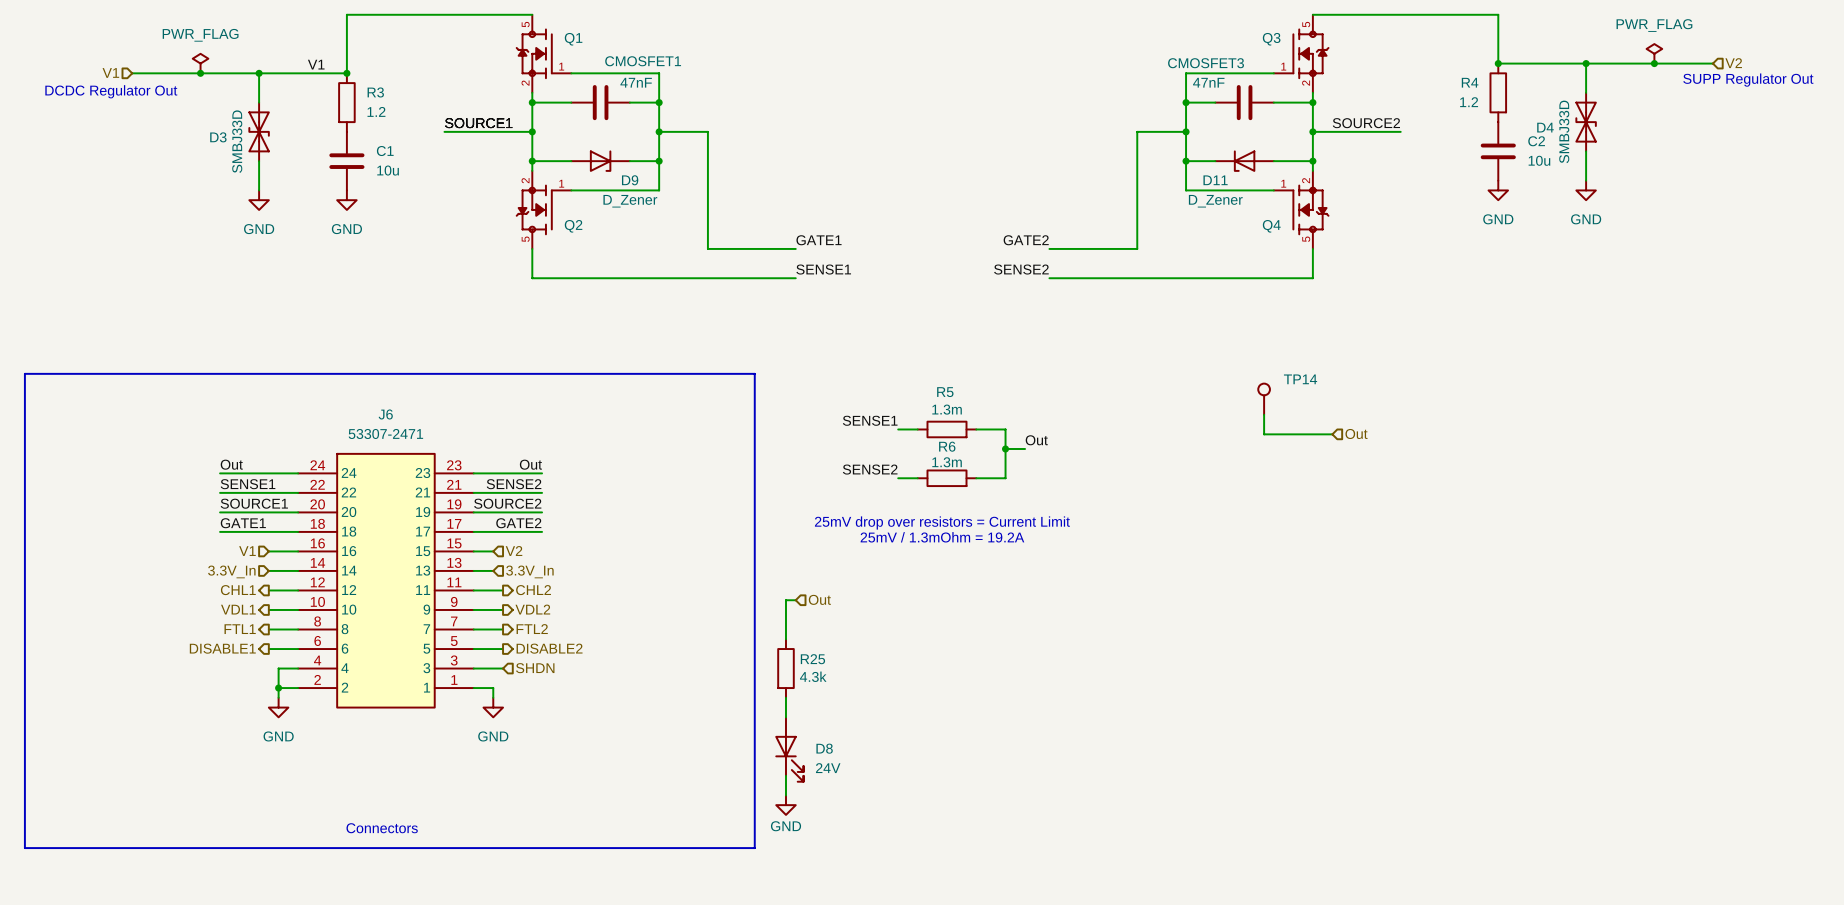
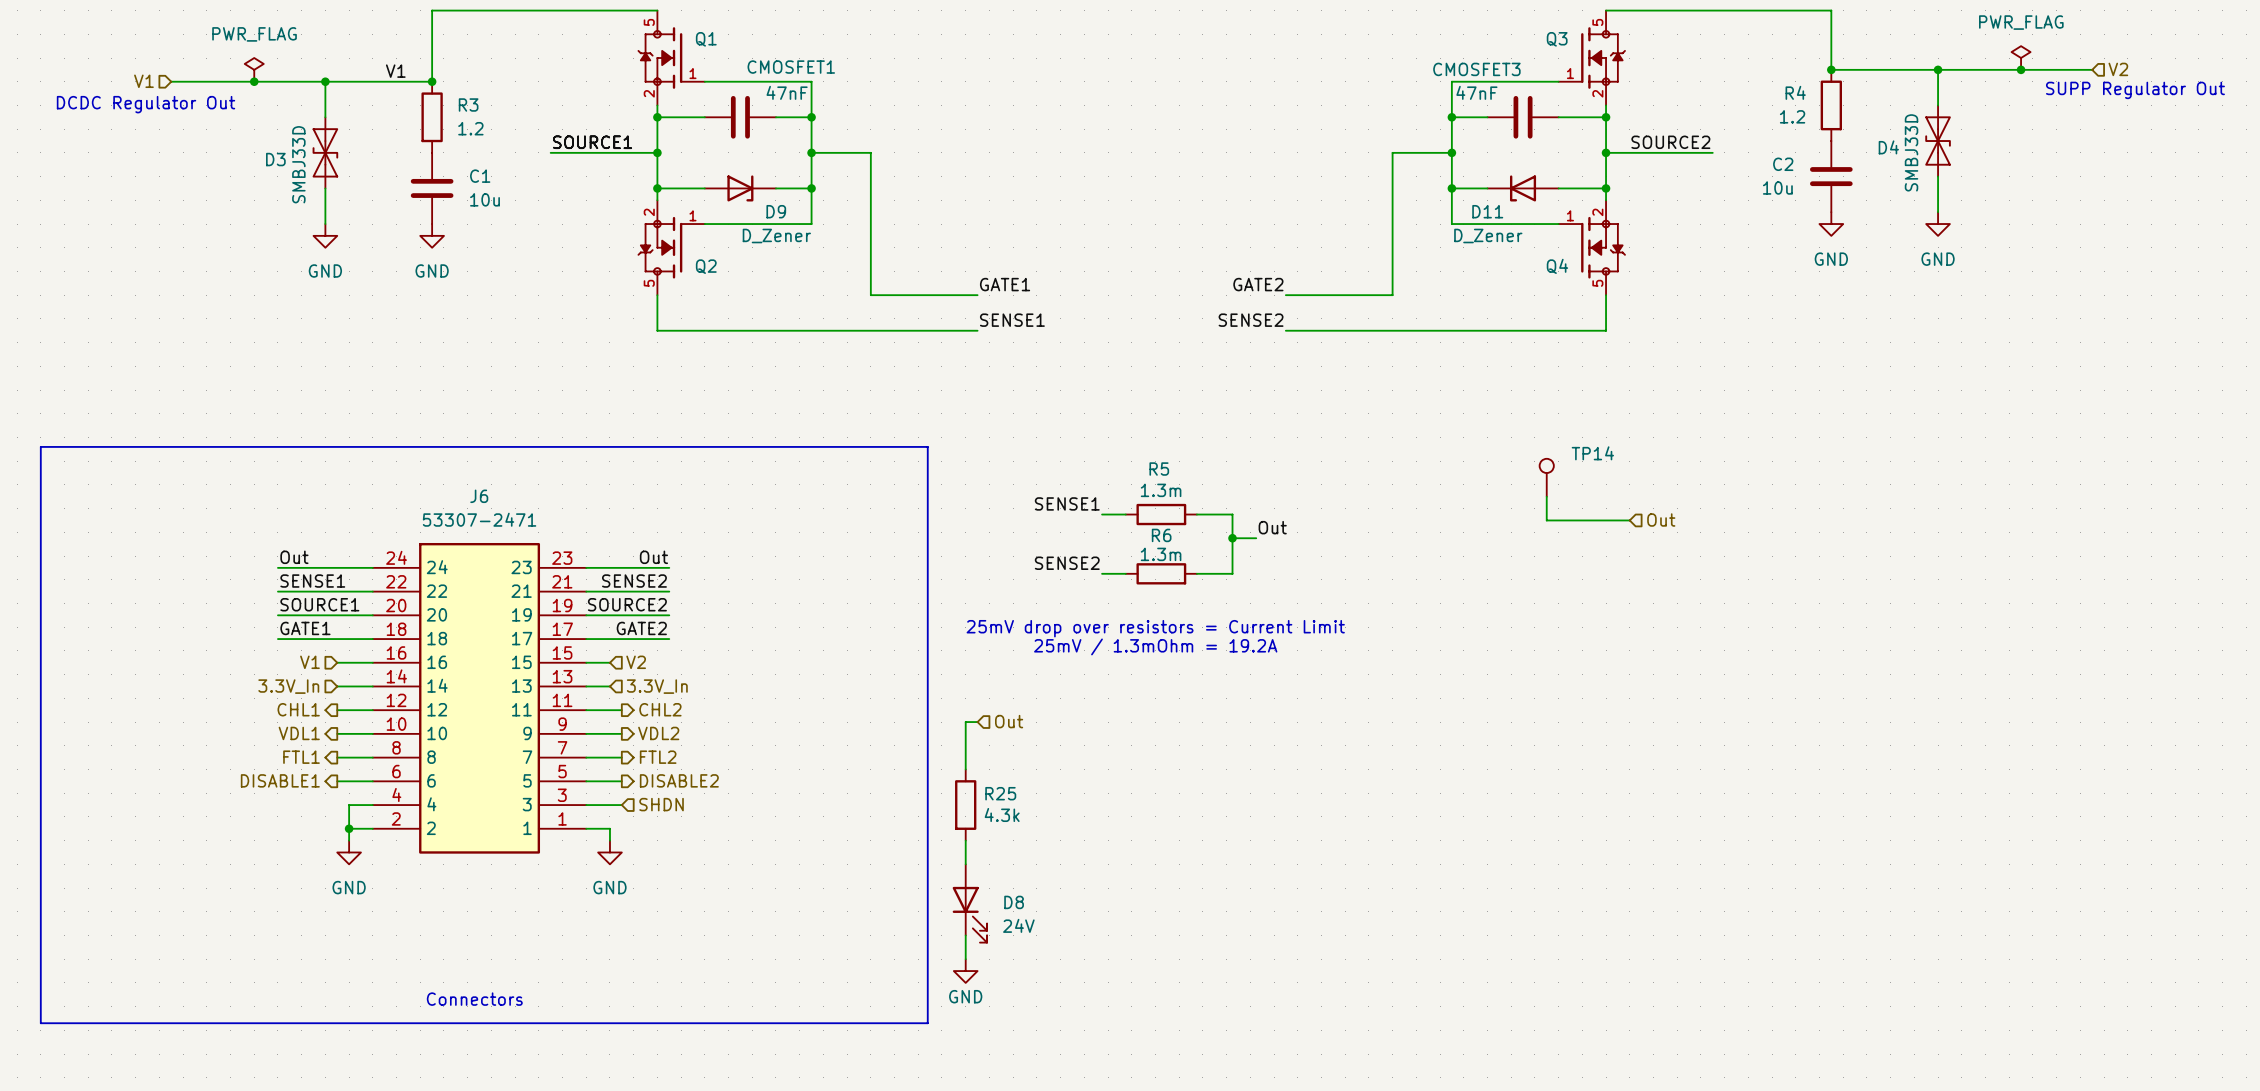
C2 name position: C2 (1536, 141) -> C2 (1783, 164)
C2 value position: 10u (1539, 160) -> 10u (1777, 188)

